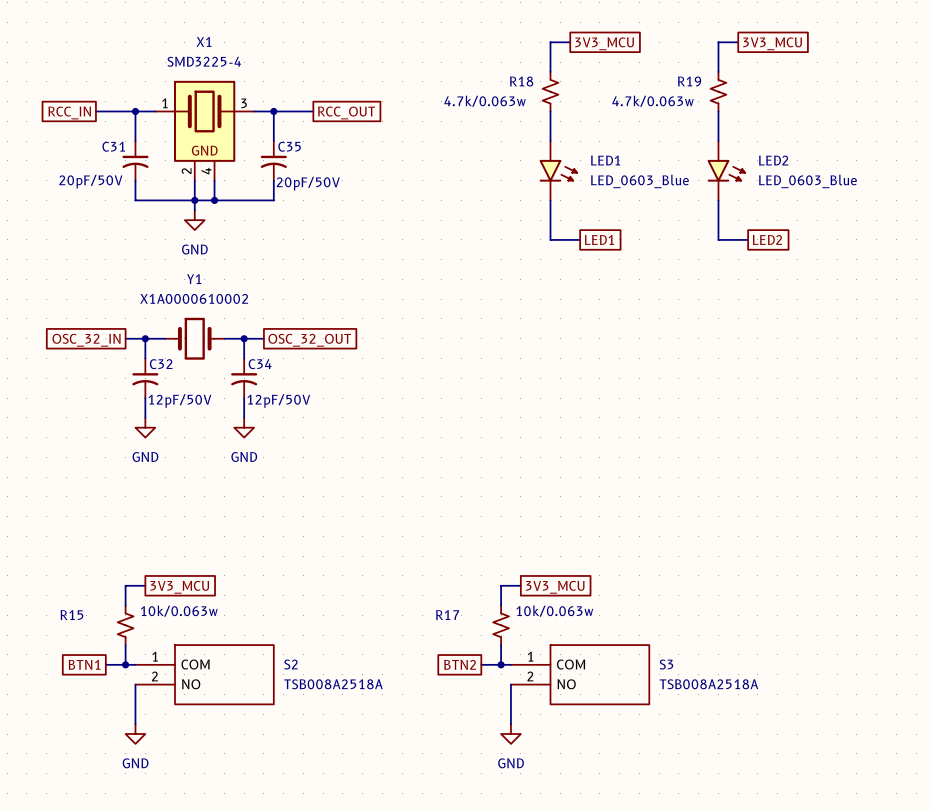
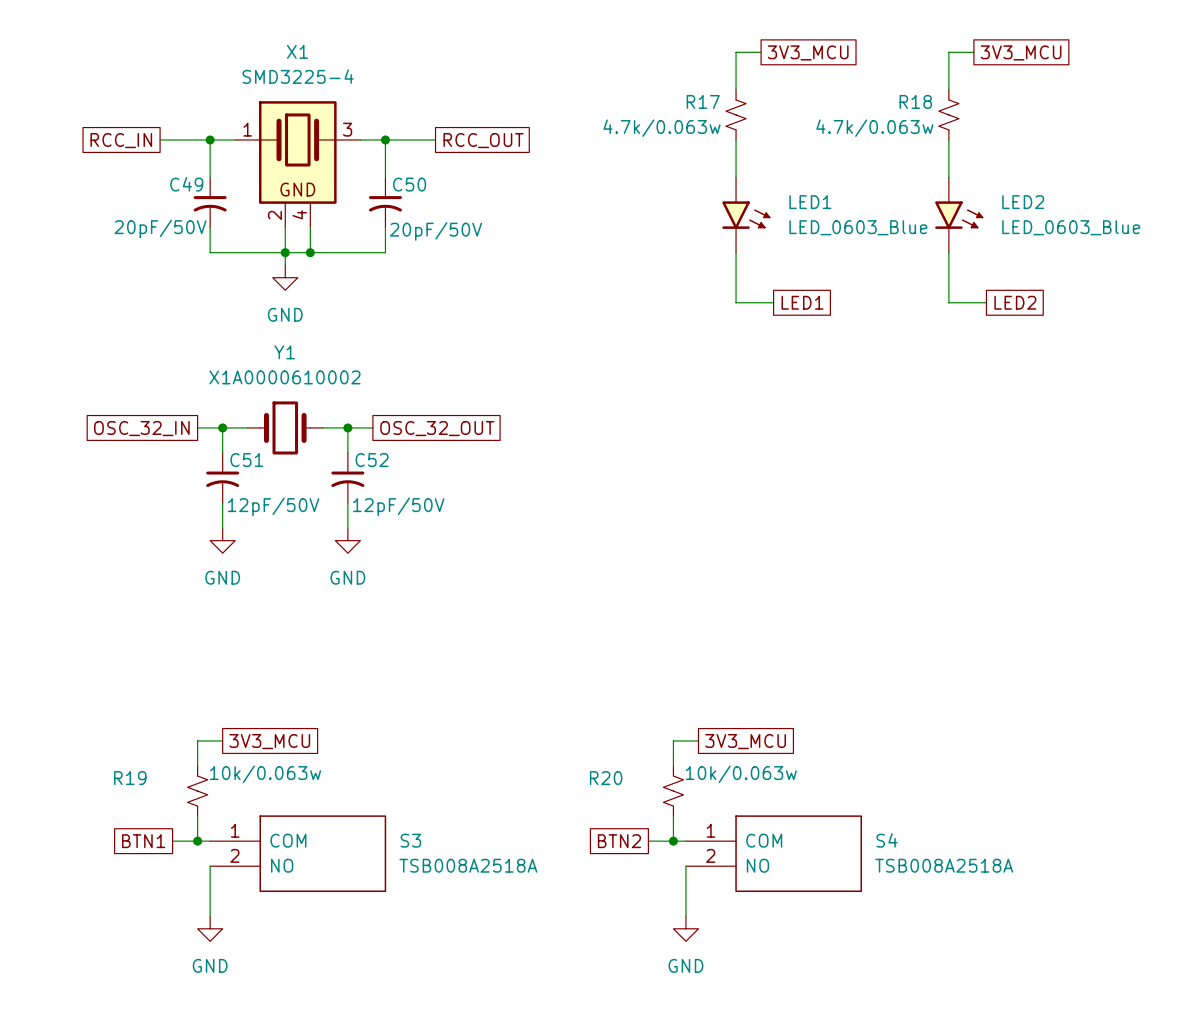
R18 name: R18 (521, 81) -> R17 (703, 101)
R19 name: R19 (689, 81) -> R18 (915, 101)
C31 name: C31 (113, 146) -> C49 (186, 184)
C35 name: C35 (289, 146) -> C50 (409, 184)
C32 name: C32 (161, 364) -> C51 (246, 460)
C34 name: C34 (260, 364) -> C52 (372, 460)
R15 name: R15 (71, 615) -> R19 (130, 778)
R17 name: R17 (447, 615) -> R20 (606, 778)
S2 name: S2 (290, 664) -> S3 (410, 840)
S3 name: S3 (666, 664) -> S4 (886, 840)

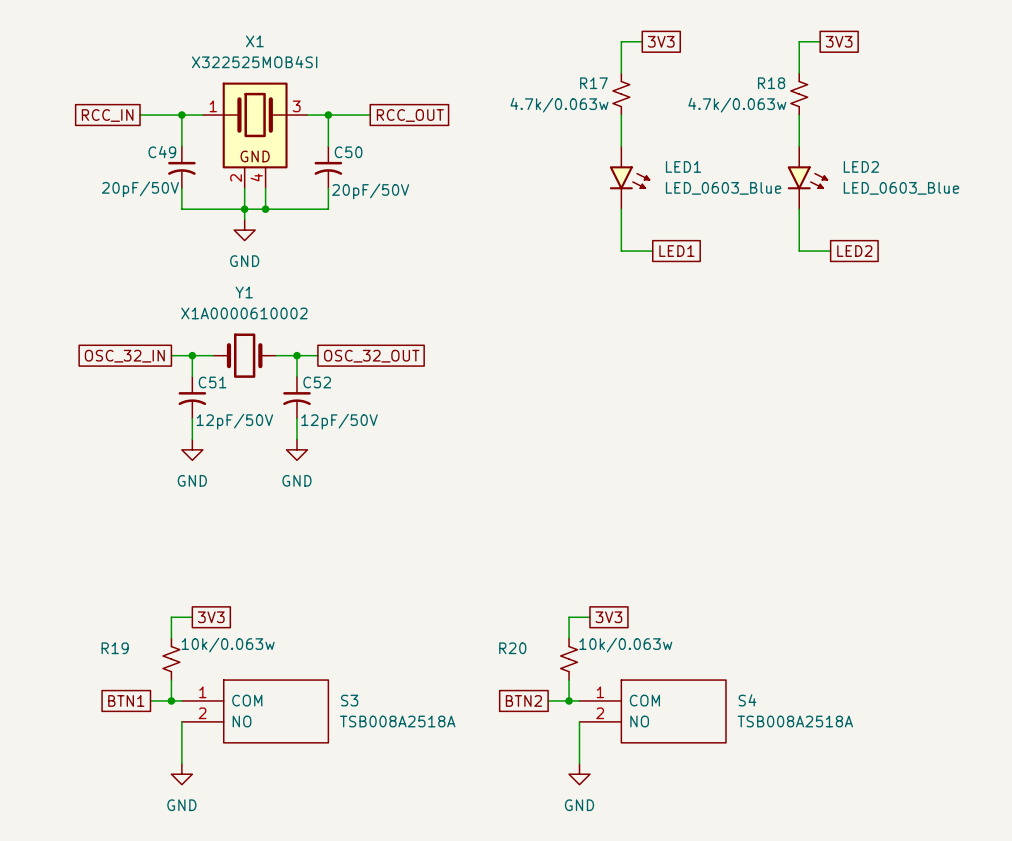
global label: 3V3_MCU (808, 52) -> 3V3 (661, 41)
global label: 3V3_MCU (1021, 52) -> 3V3 (839, 41)
X1 value: SMD3225-4 (298, 76) -> X322525MOB4SI (254, 62)
global label: 3V3_MCU (269, 741) -> 3V3 (211, 617)
global label: 3V3_MCU (745, 741) -> 3V3 (608, 617)

